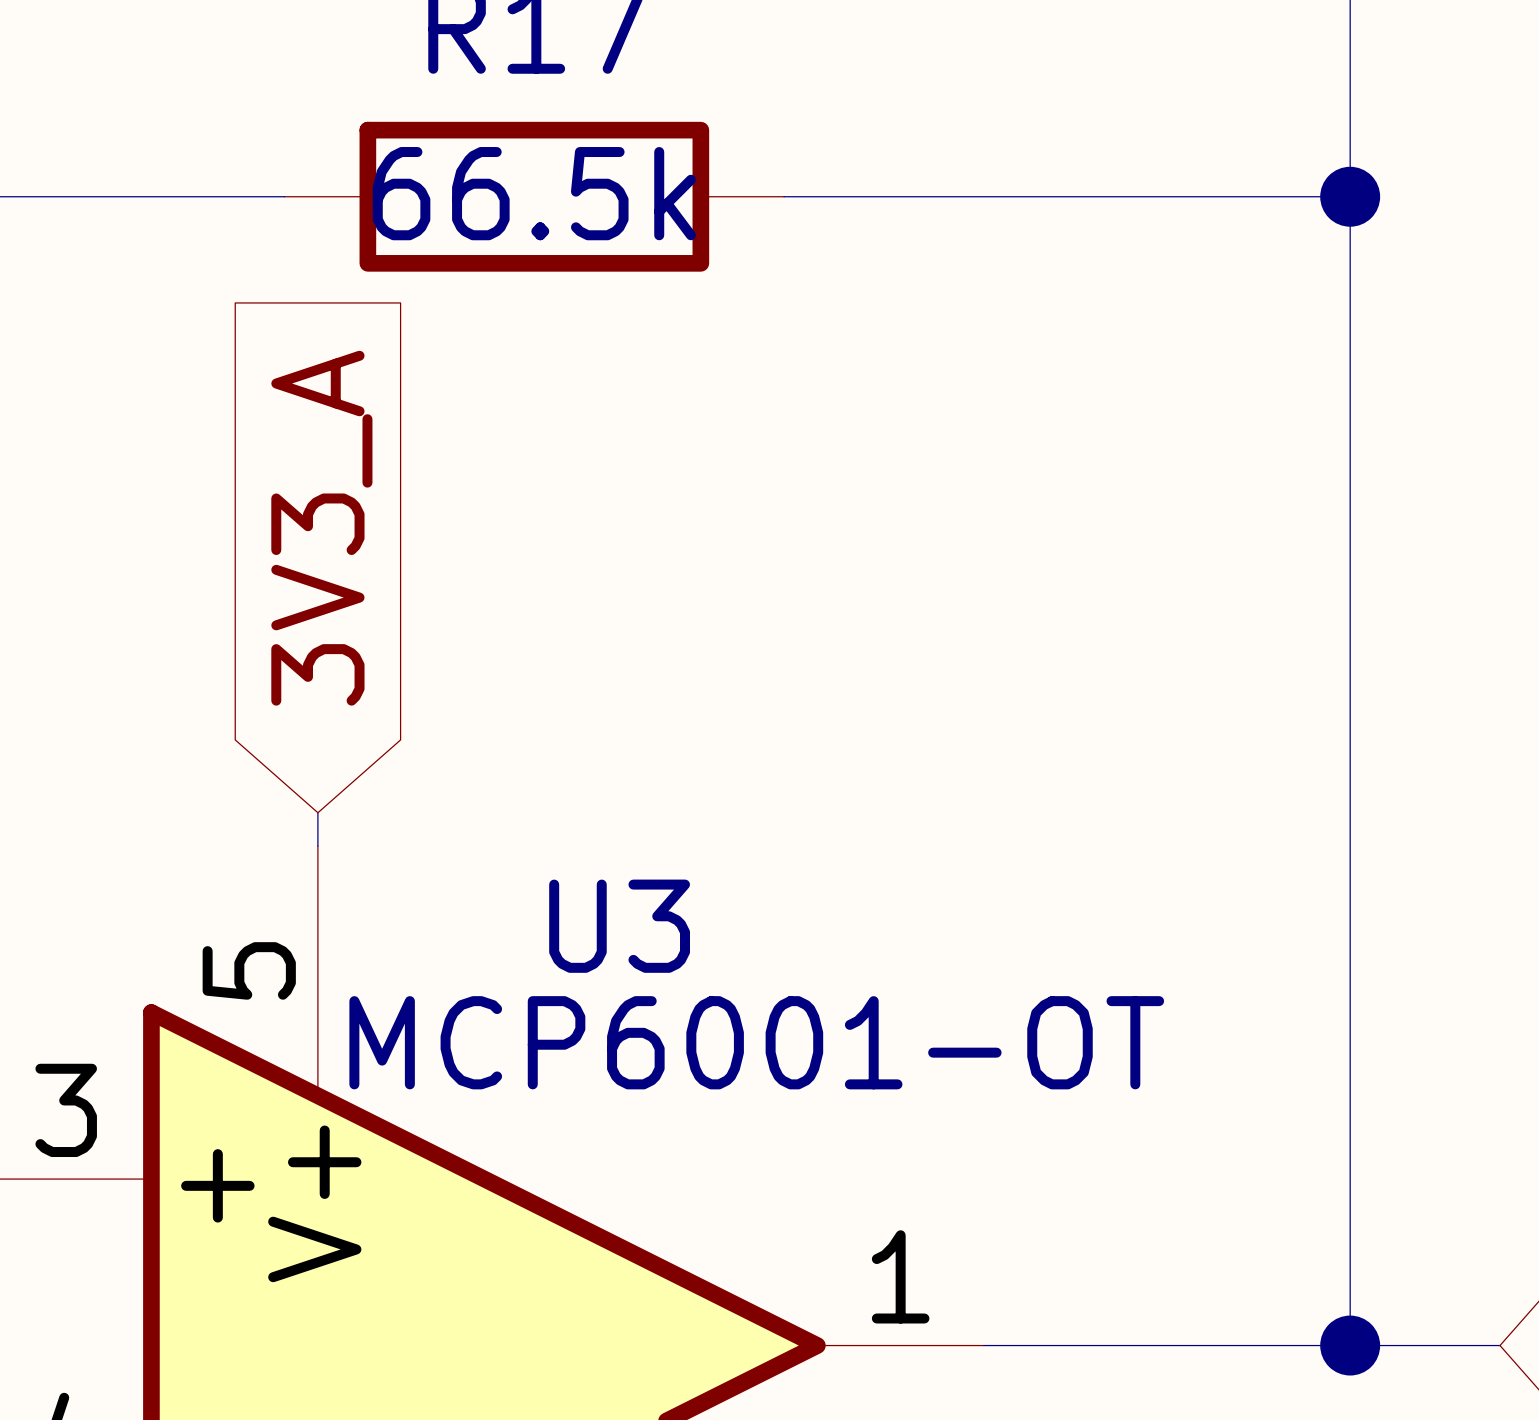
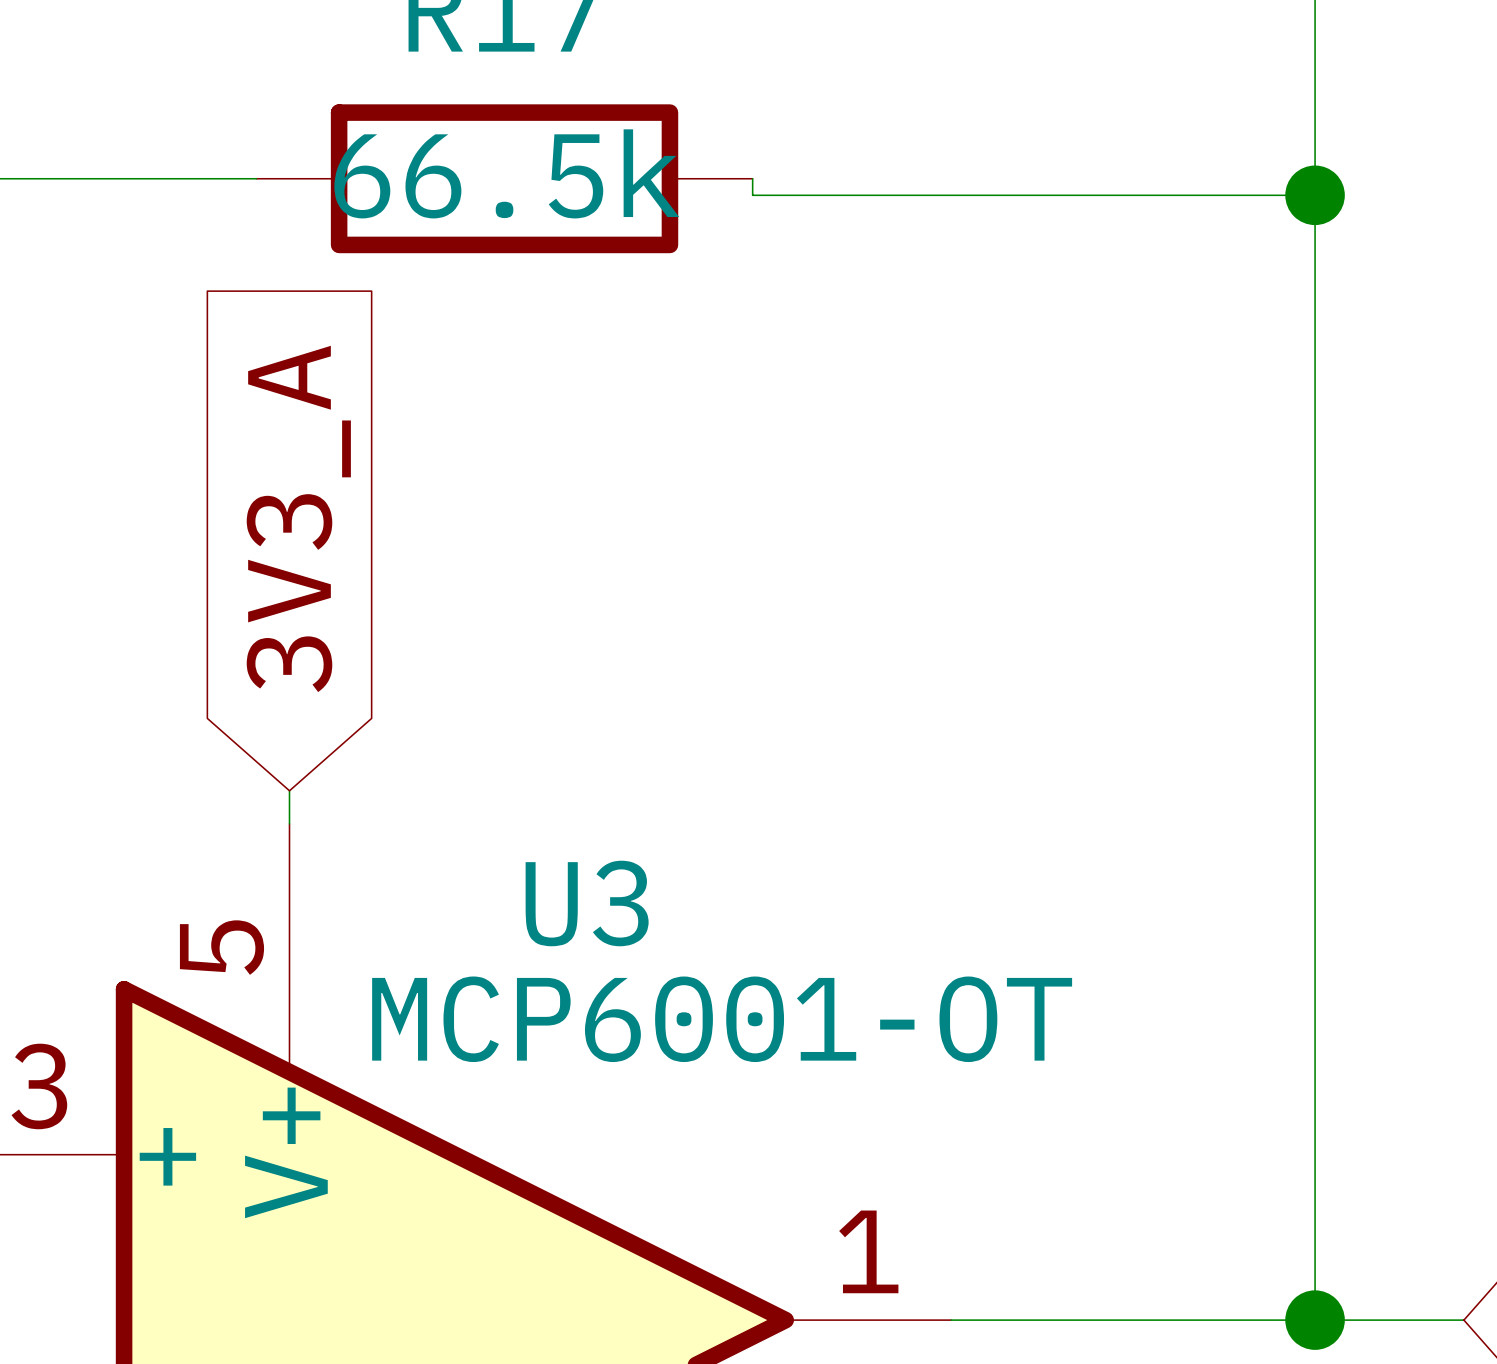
wire: (784, 196) (1350, 196) -> (752, 178) (752, 195) (1315, 195)
junction position: (1350, 196) -> (1315, 195)

